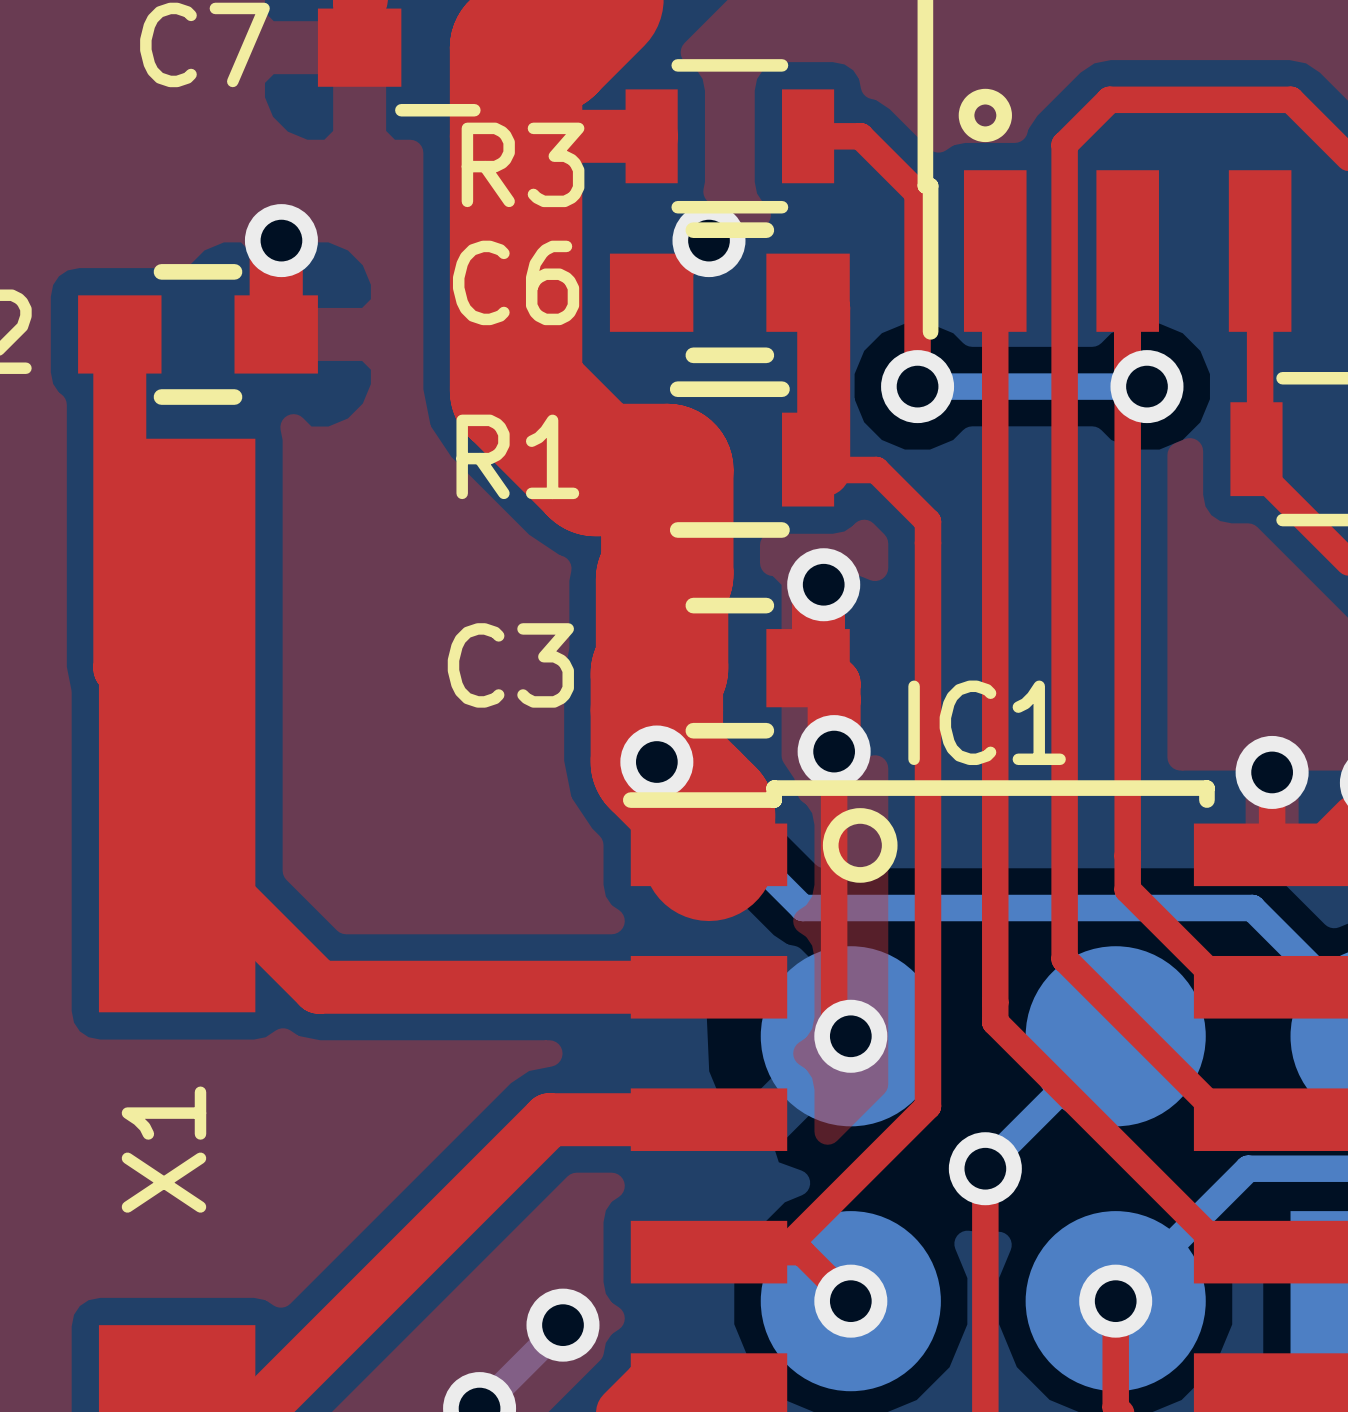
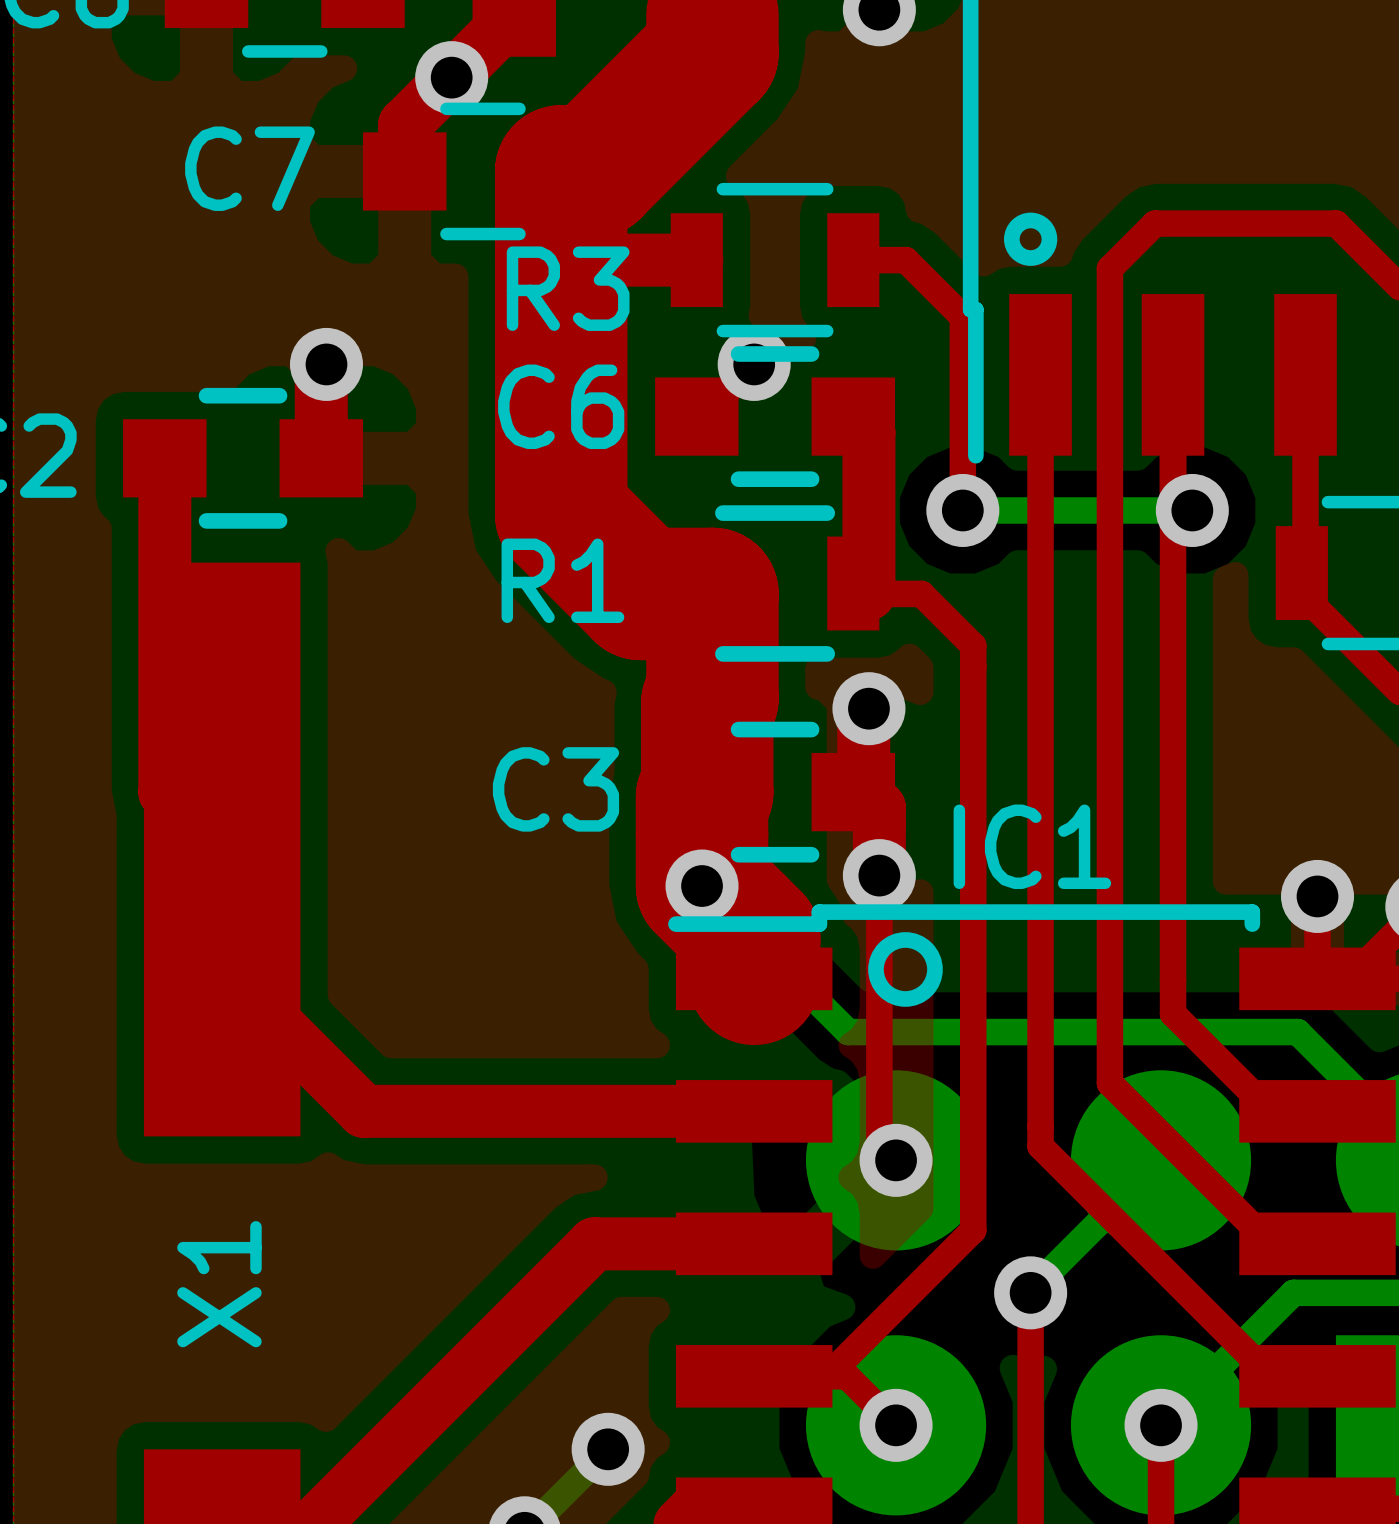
X1 name position: X1 (163, 1149) -> X1 (219, 1284)

